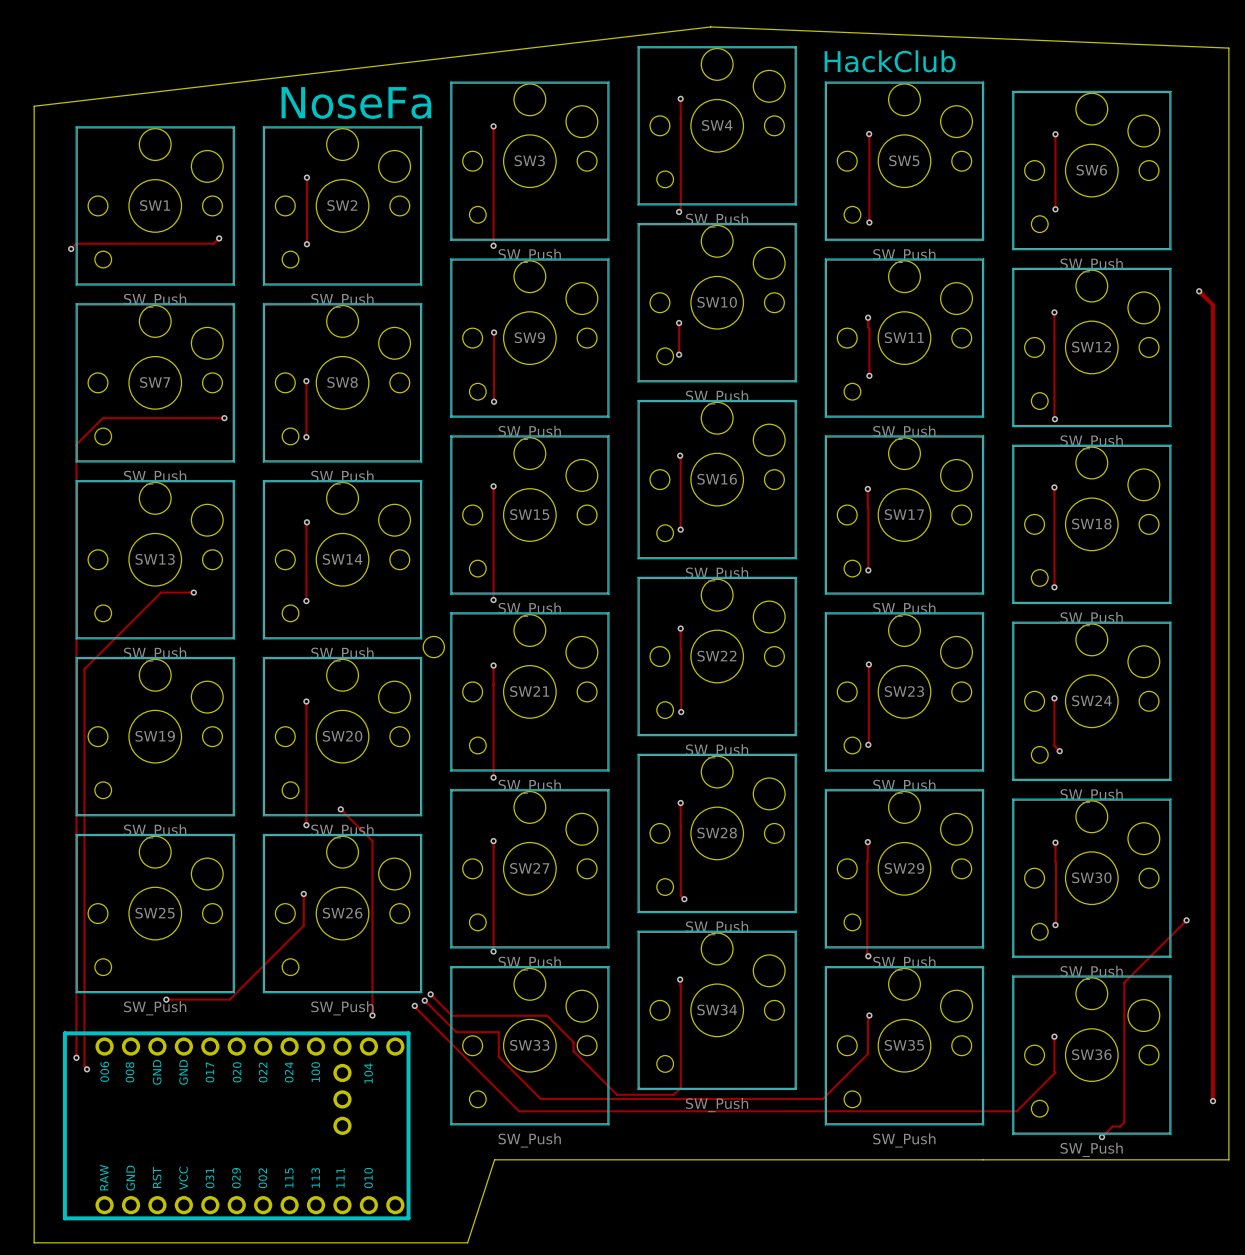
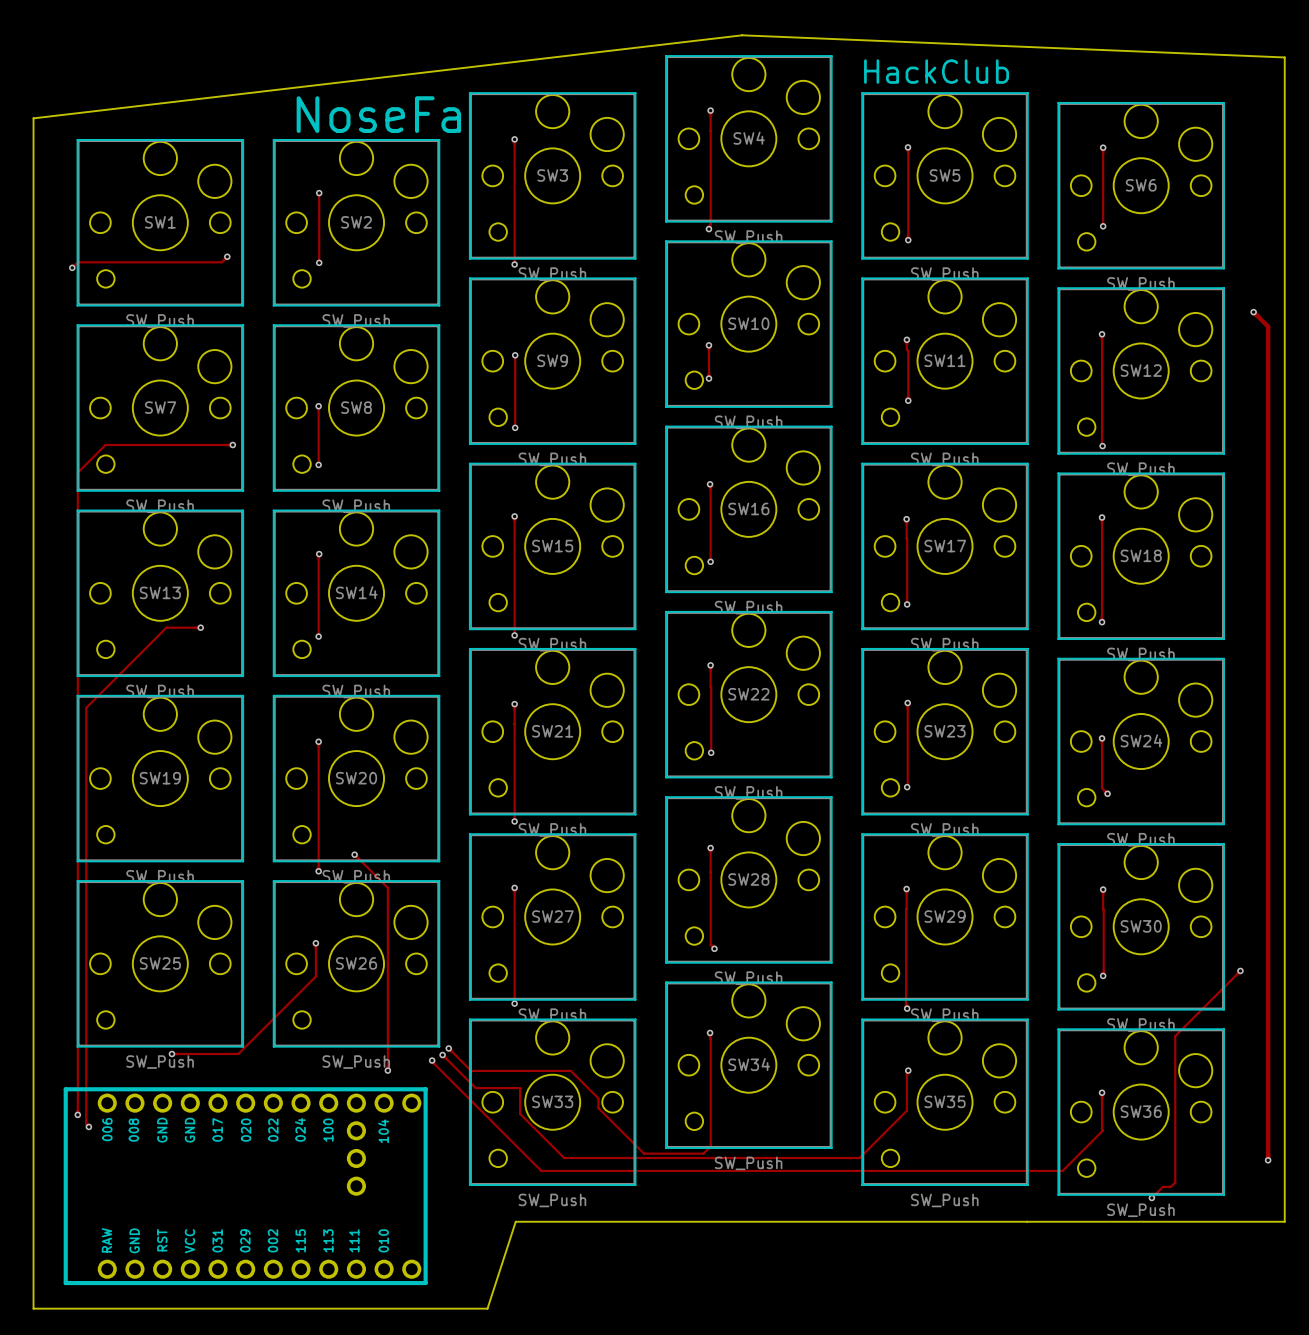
round board edge: [422, 636, 445, 658] -> none

